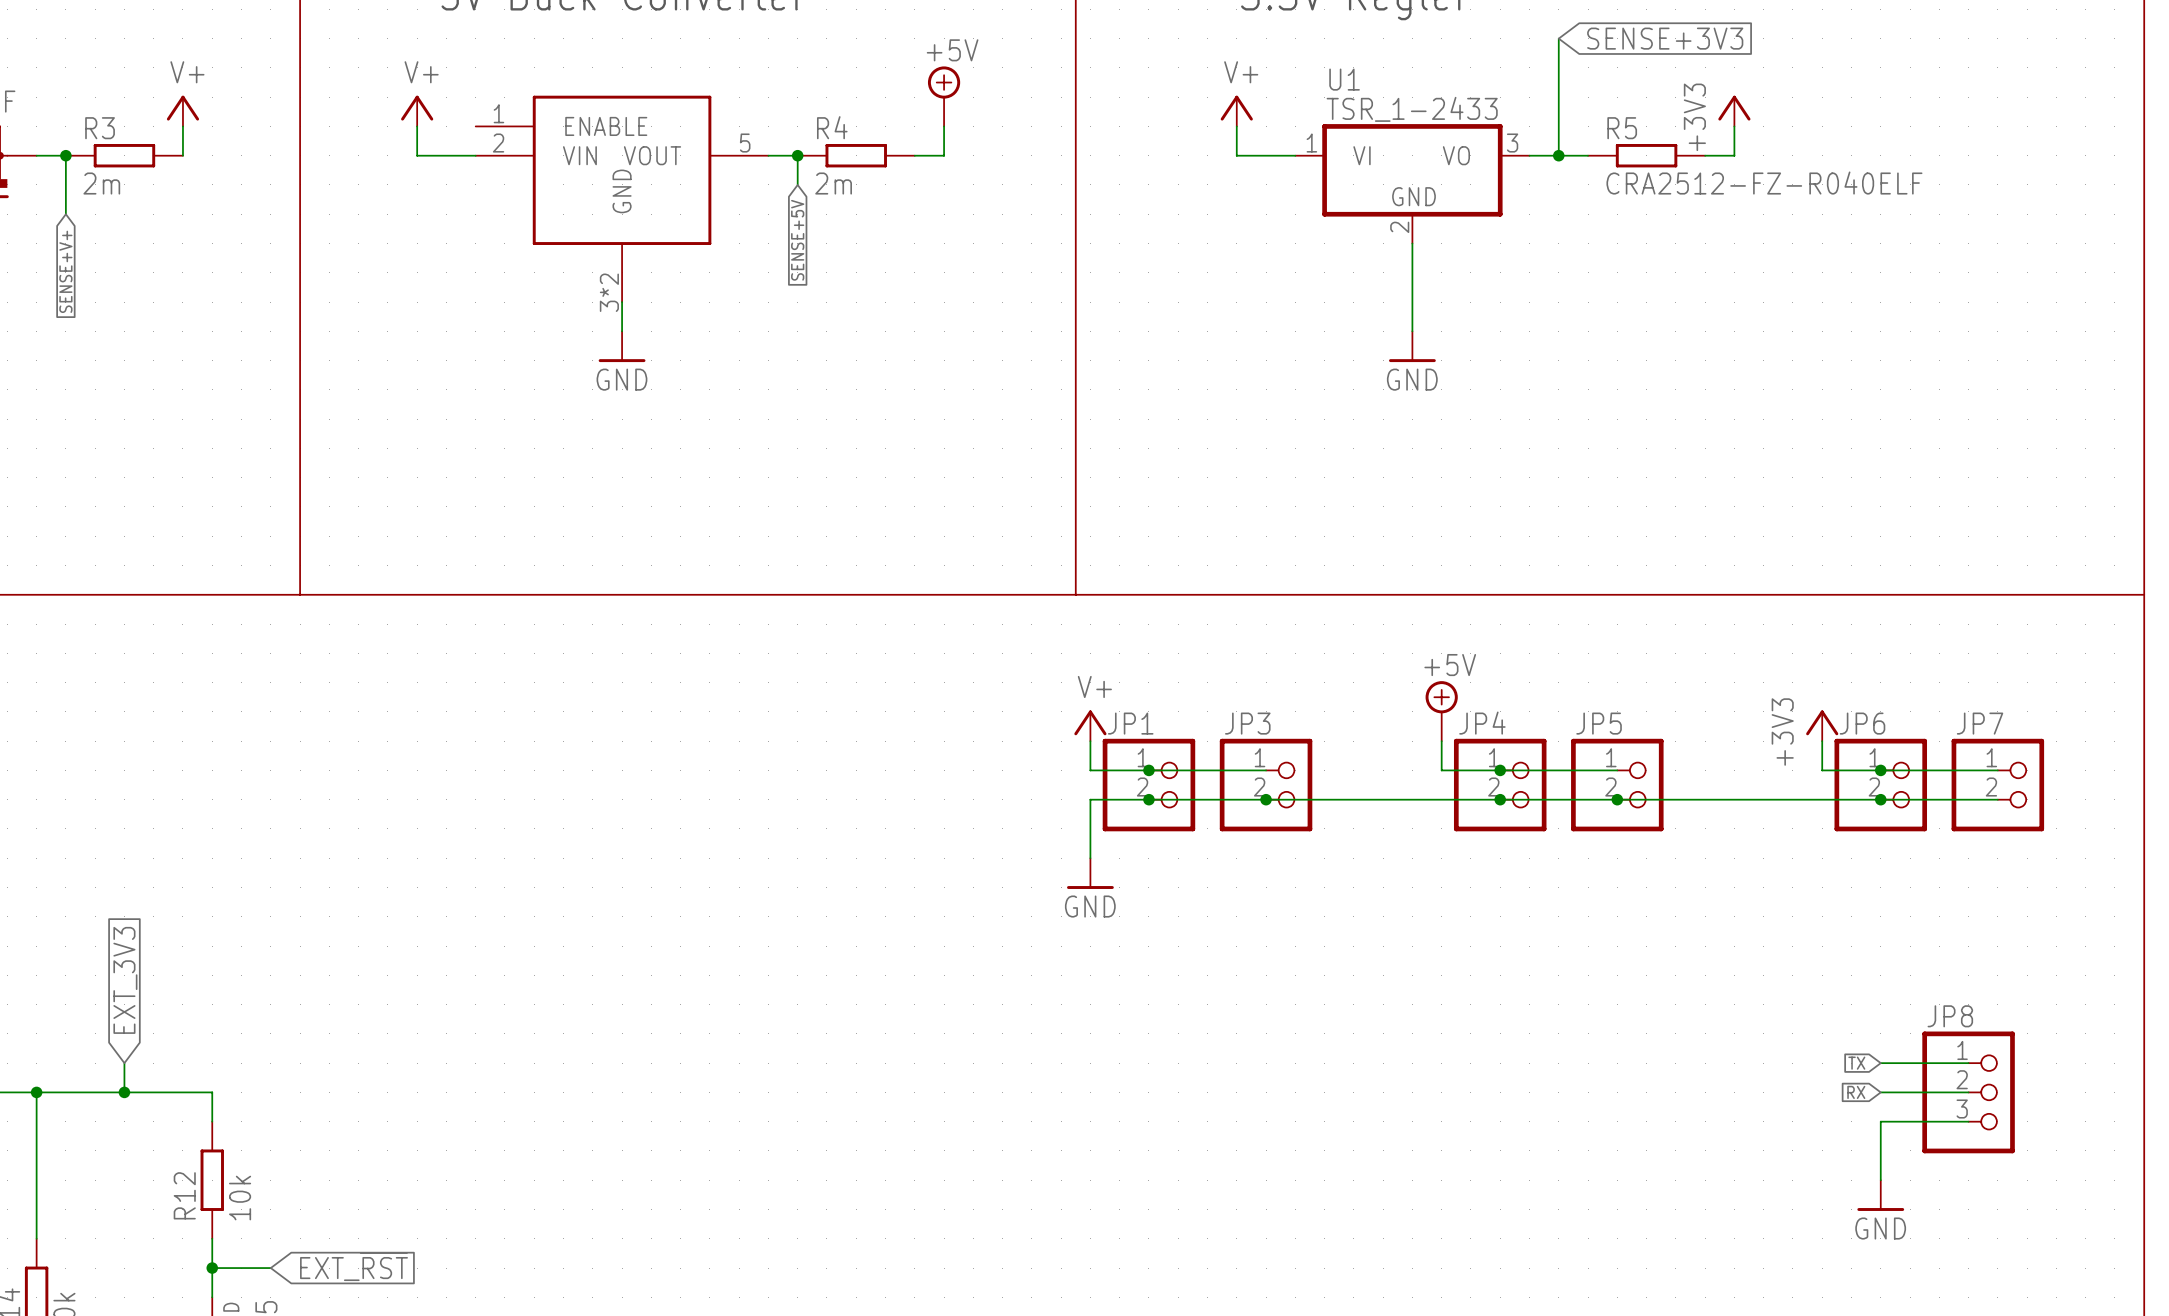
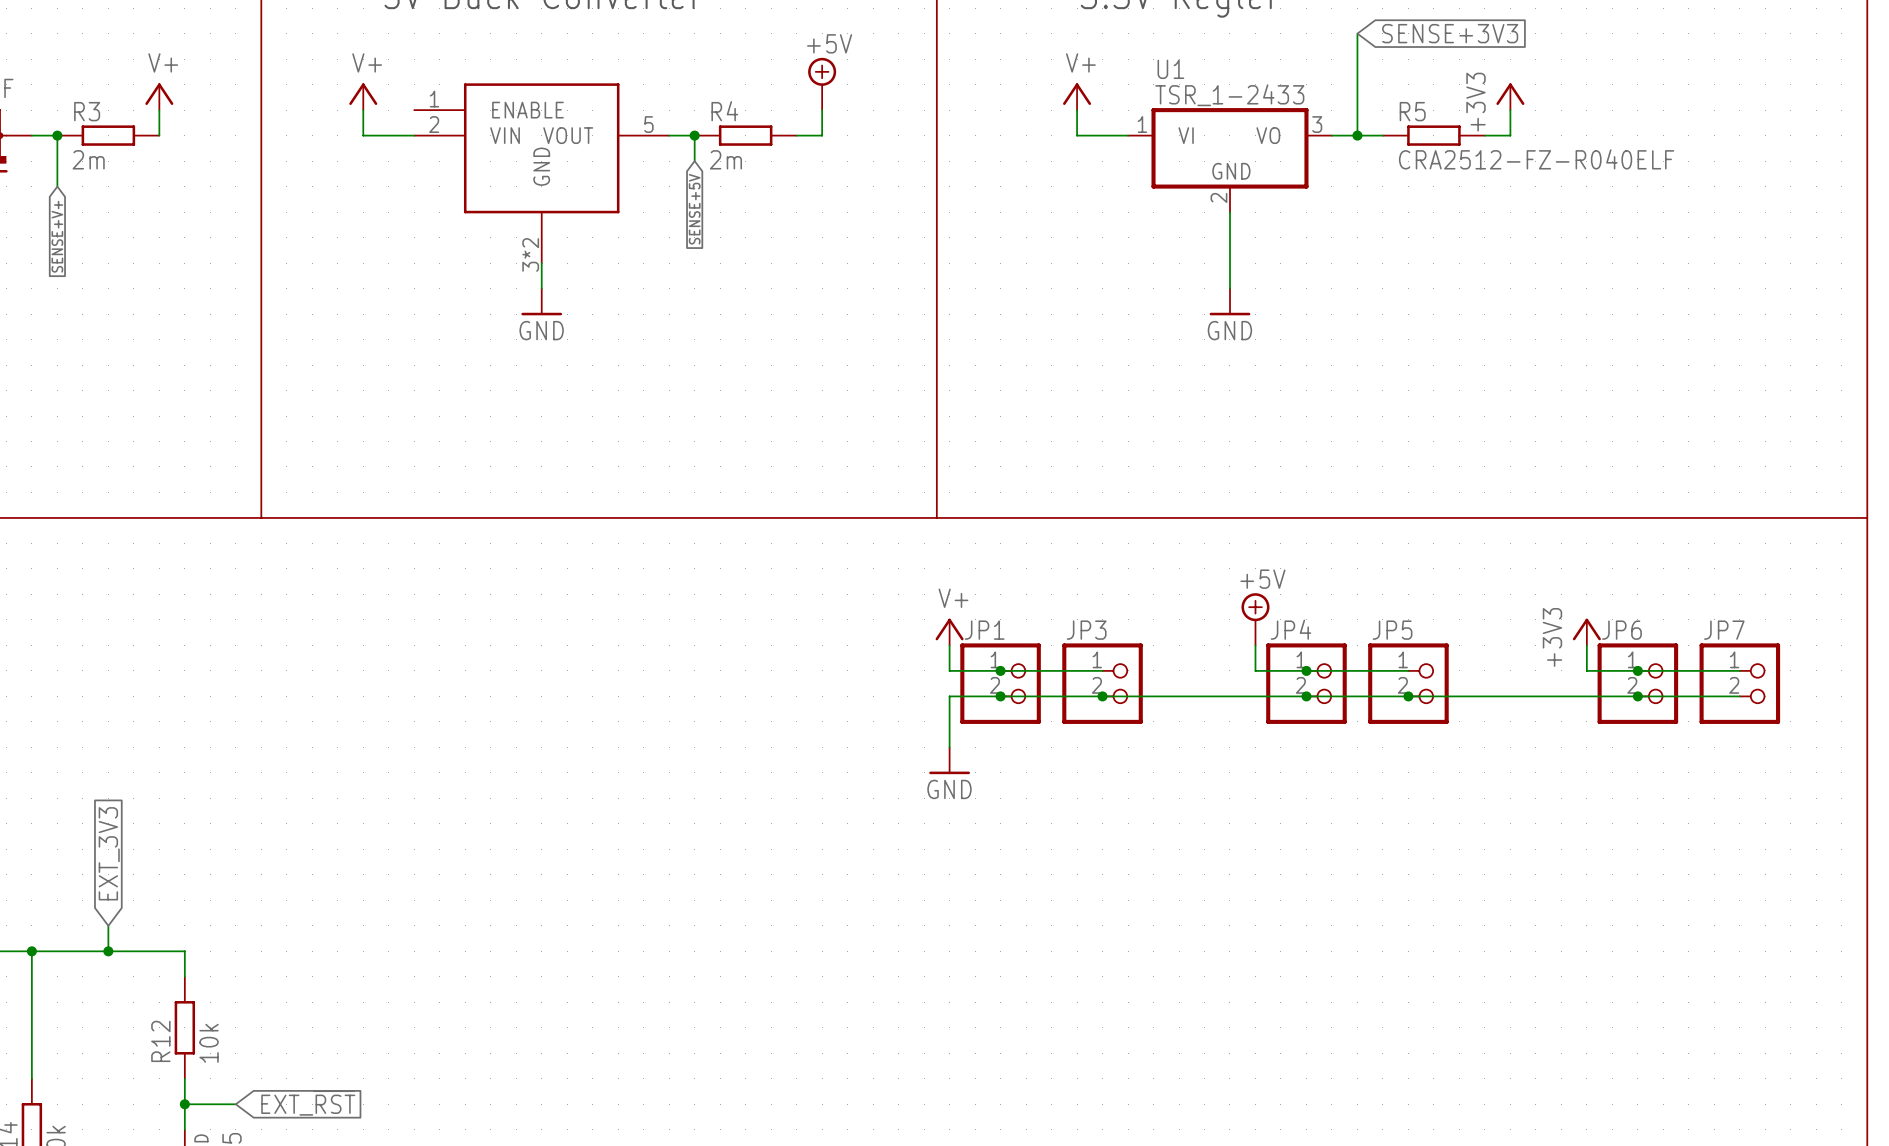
global label: TX (1856, 1063) -> none
wire: (1880, 1063) (1968, 1063) -> none
global label: RX (1856, 1092) -> none
wire: (1880, 1092) (1968, 1092) -> none
JP8: (1968, 1092) -> none
wire: (1968, 1121) (1880, 1121) (1880, 1180) -> none
power symbol: GND (1880, 1195) -> none

